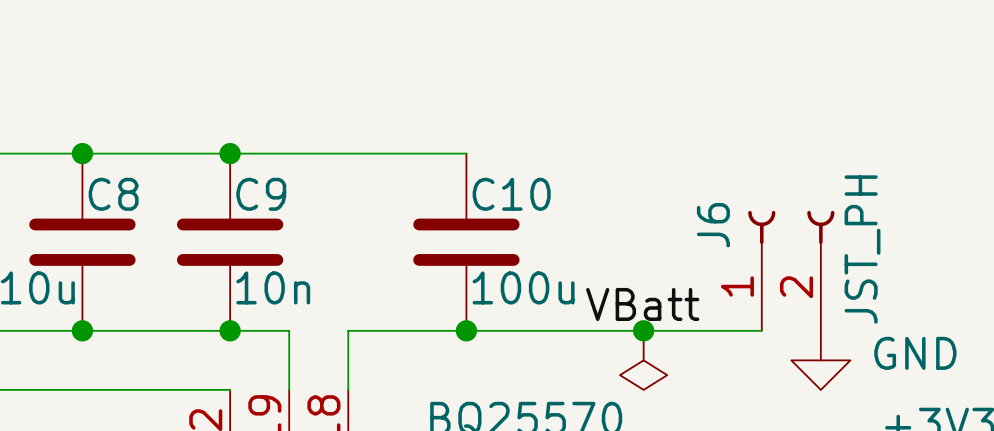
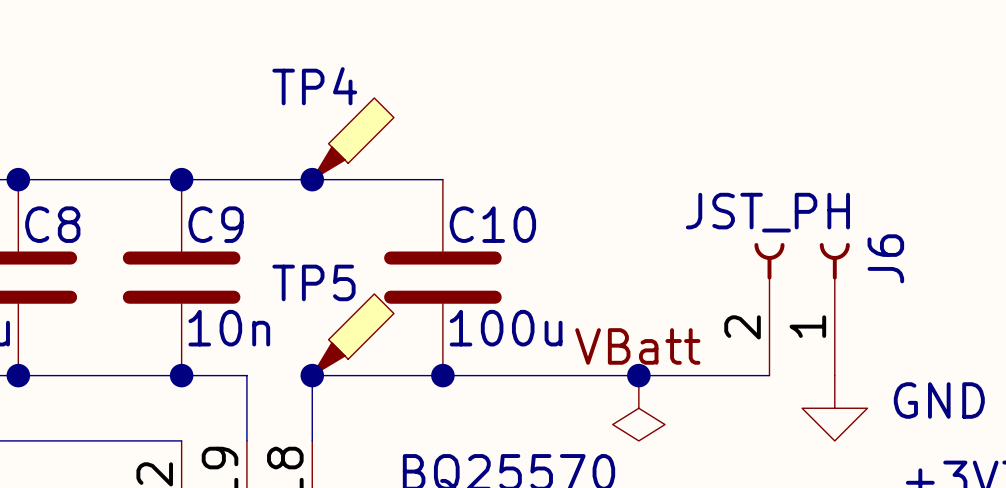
TP4: none -> (353, 138)
junction: none -> (312, 179)
J6 flip: as is (791, 227) -> left-right (802, 261)
J6 value position: JST_PH (862, 249) -> JST_PH (767, 212)
TP5: none -> (353, 334)
junction: none -> (312, 375)

